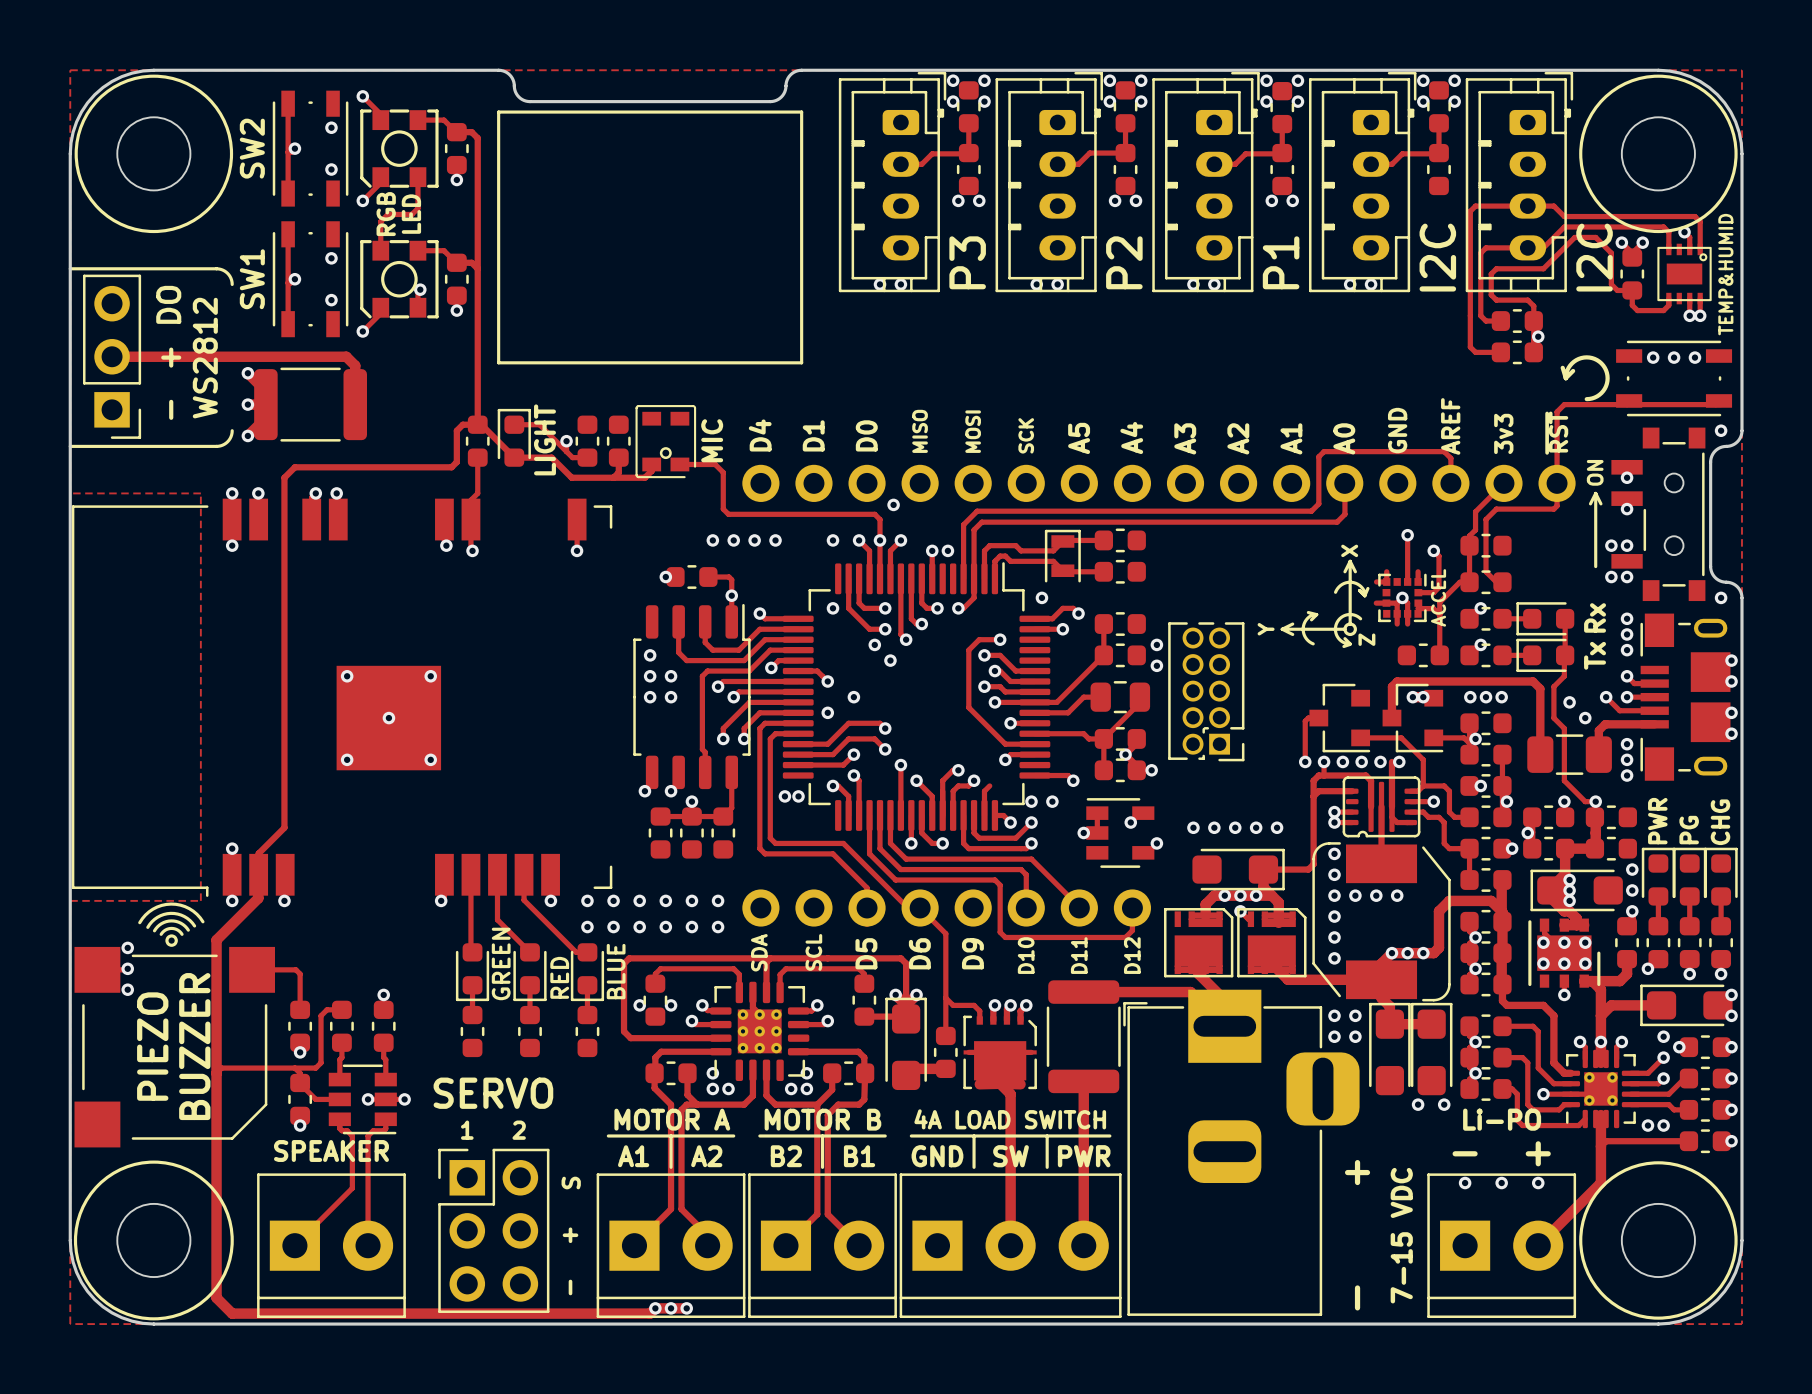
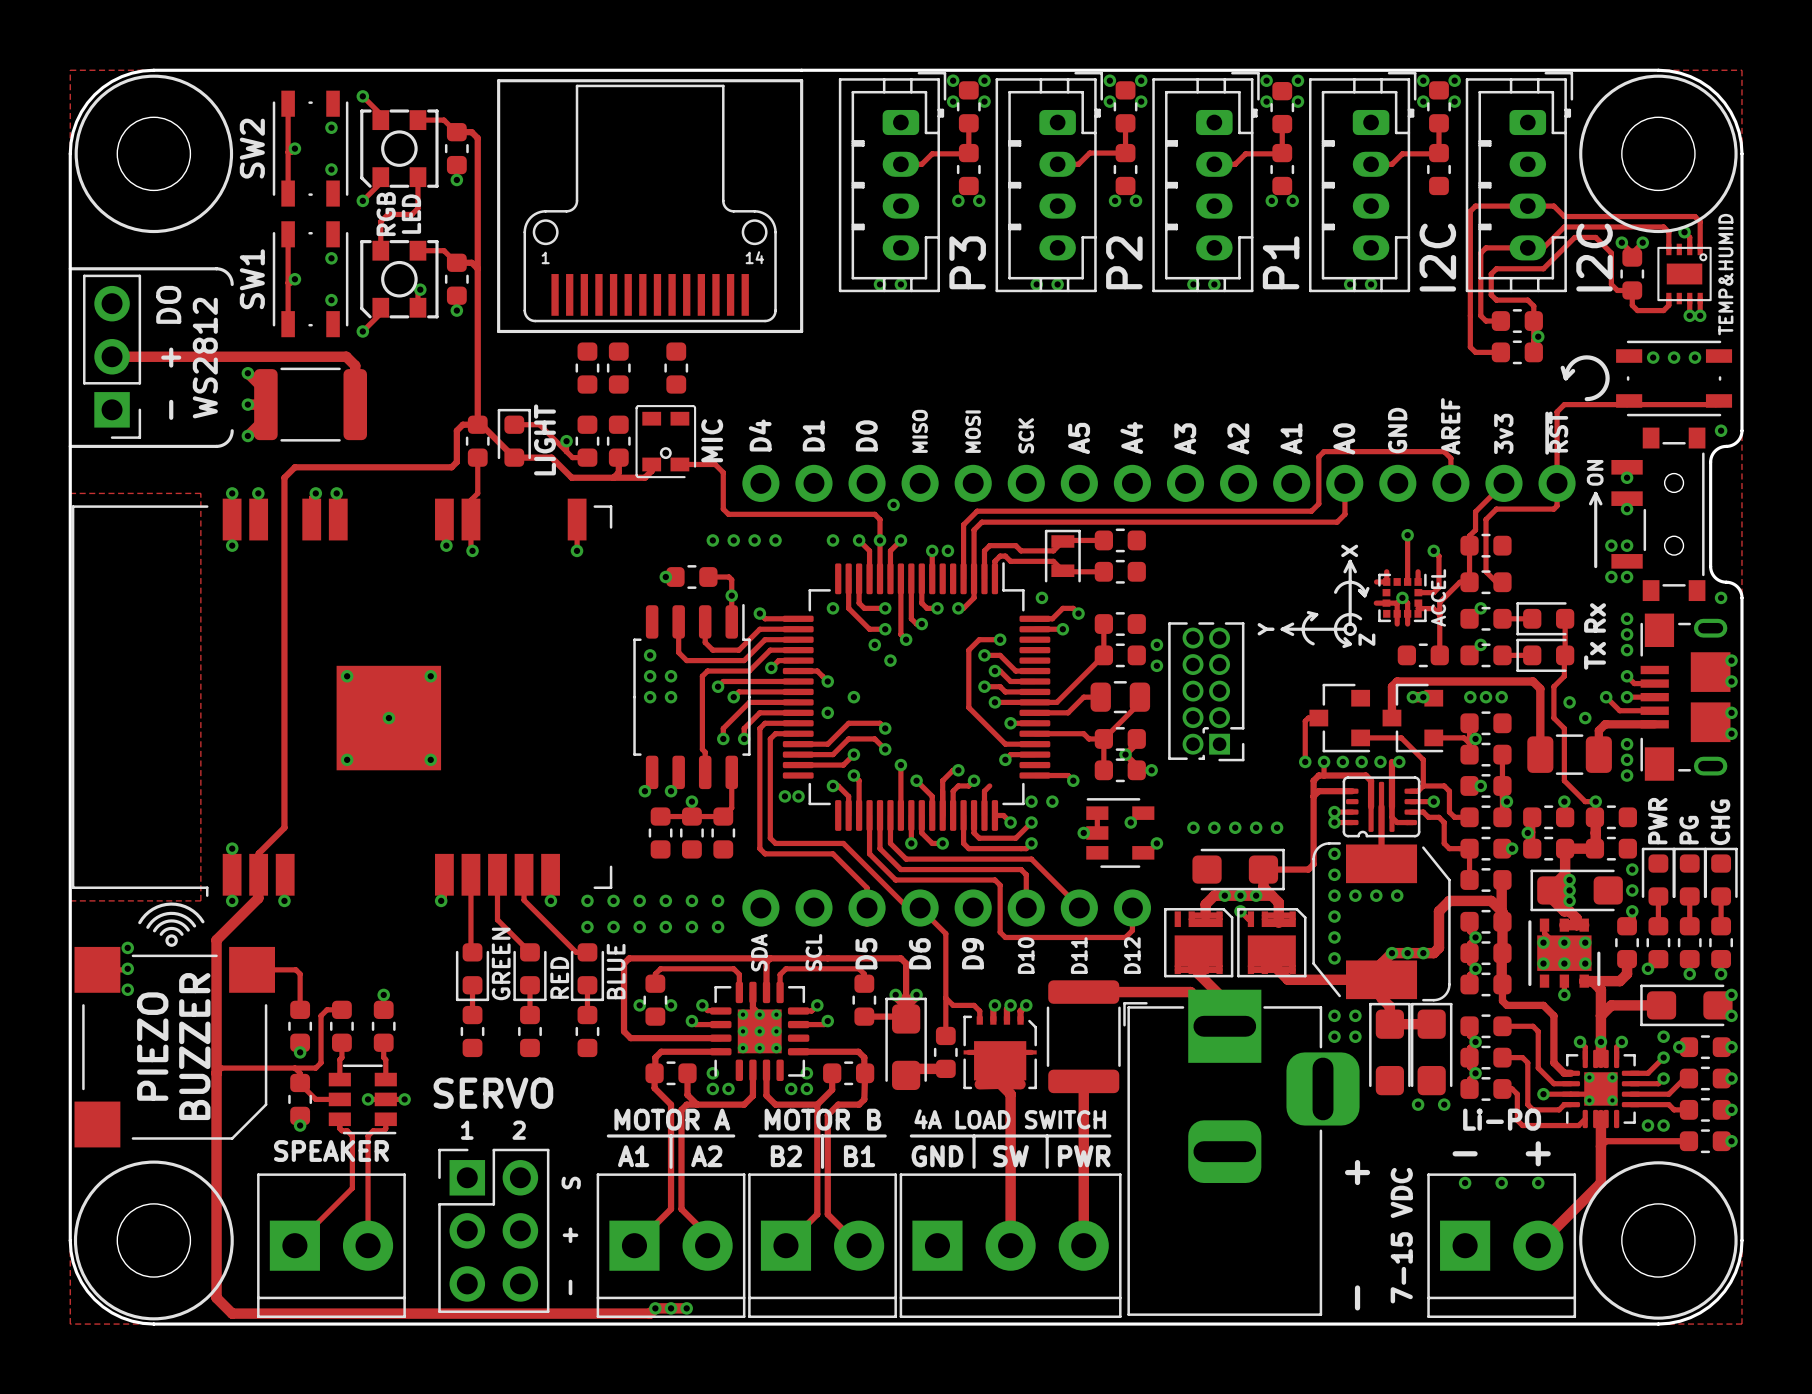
board edge: (498, 70) (509, 74) (517, 95) (523, 100) (529, 101) (772, 101) (782, 95) (790, 74) (801, 70) -> (498, 70) (801, 70)
line: (498, 112) (801, 112) -> (498, 112) (498, 80) (801, 80) (801, 112)
part: none -> (650, 203)
line: (498, 331) (498, 362) (801, 362) (801, 331) -> (498, 331) (801, 331)
part: none -> (587, 368)
part: none -> (618, 368)
part: none -> (676, 368)

